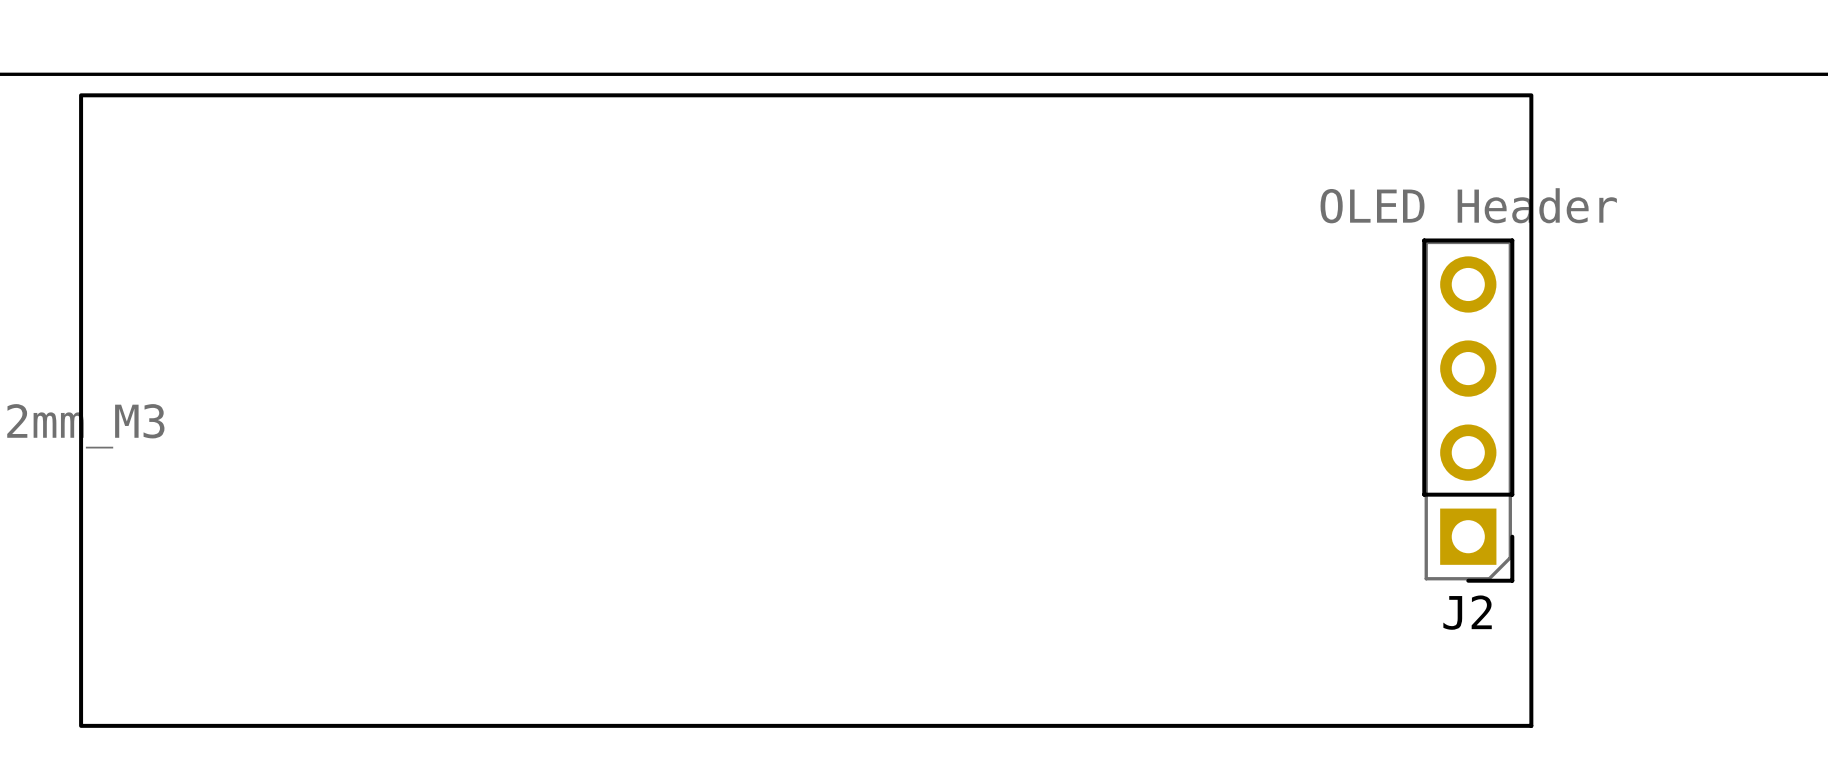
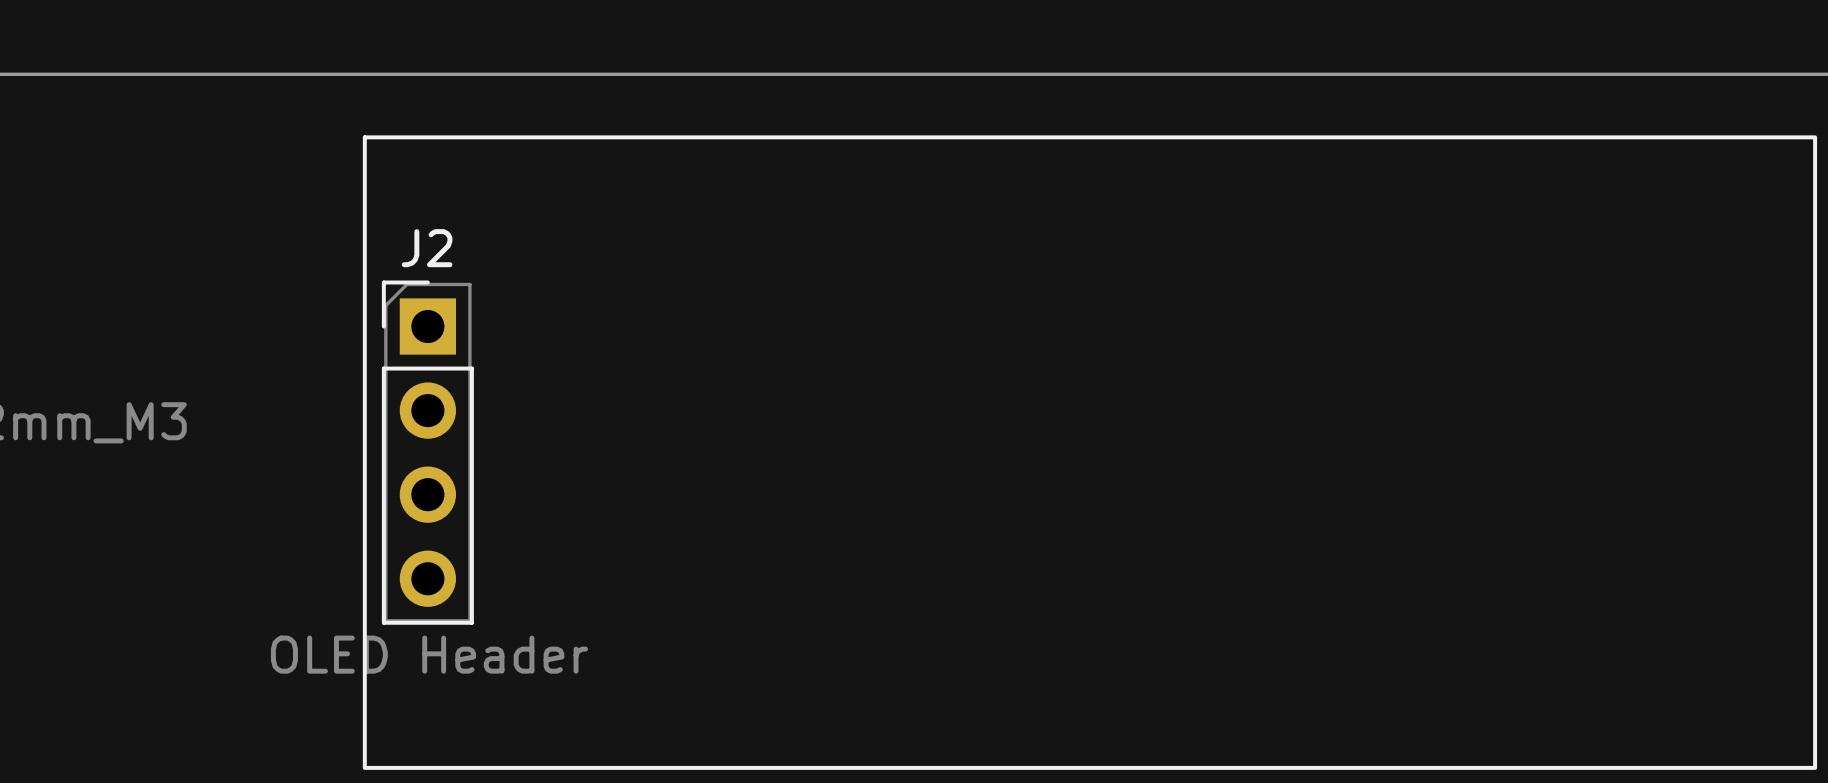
J2 rotation: 0° (806, 410) -> 180° (1089, 452)

